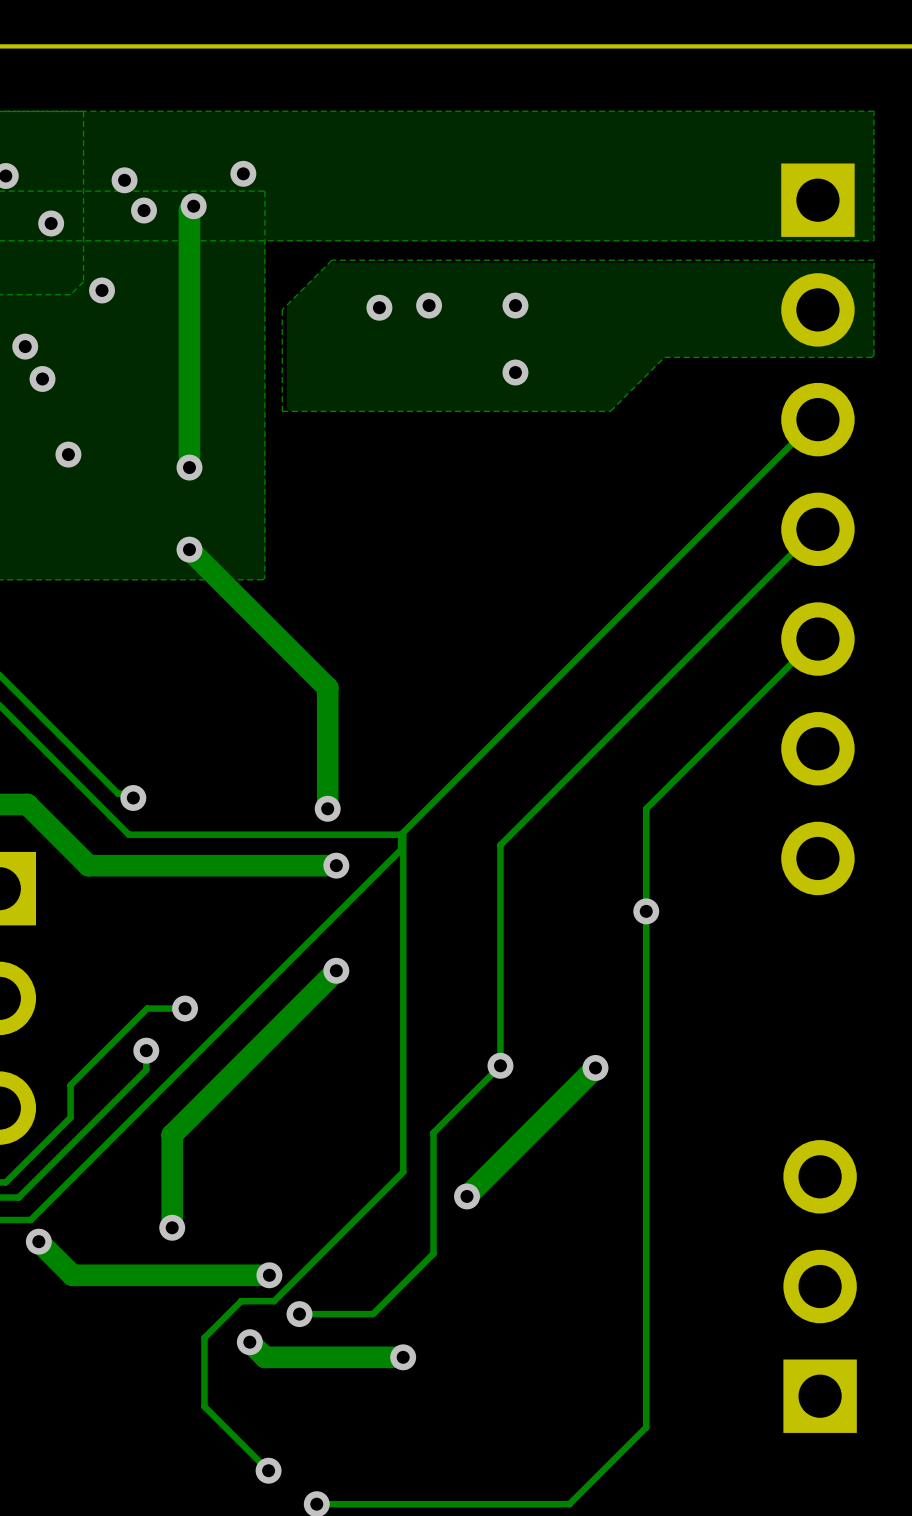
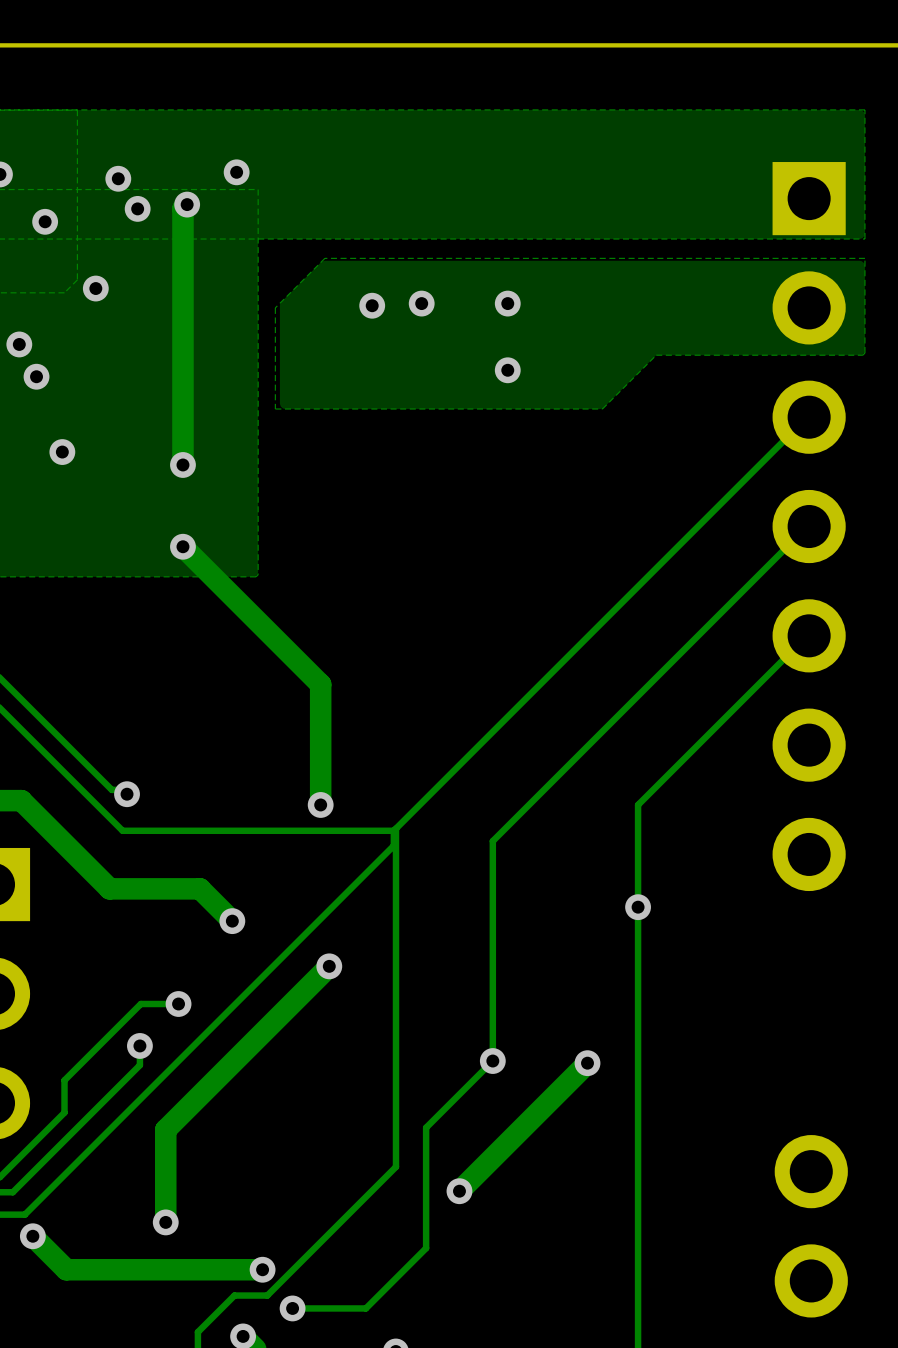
track: (336, 865) (88, 865) -> (232, 921) (200, 888) (109, 888) (82, 861)
via position: (336, 865) -> (232, 921)

